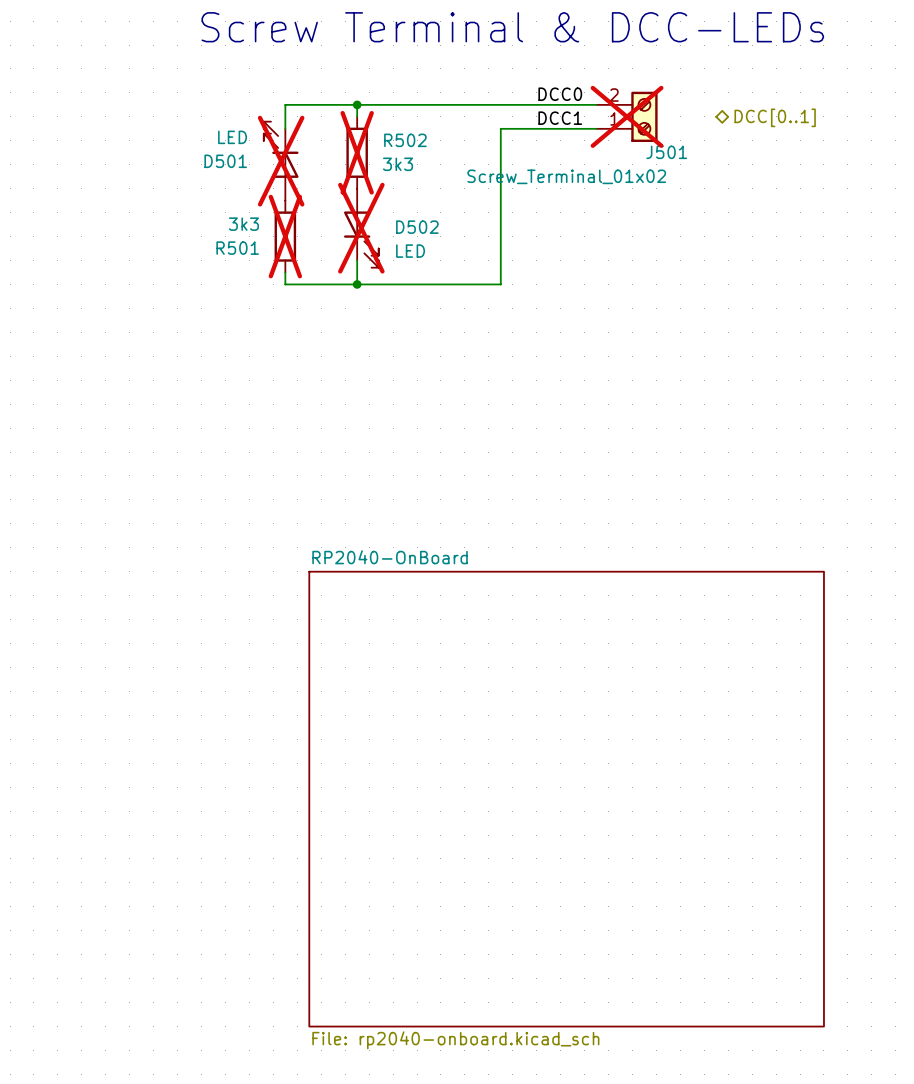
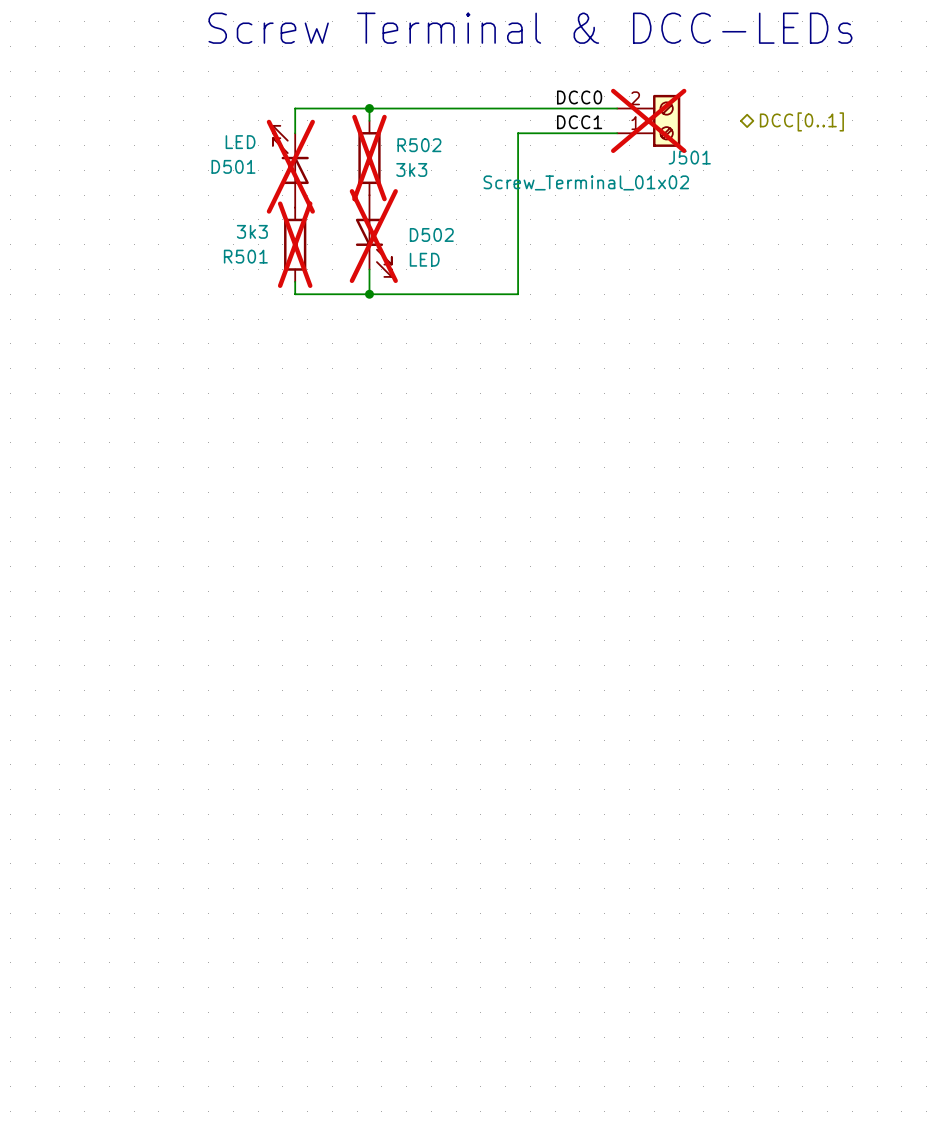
sheet RP2040-OnBoard: File: rp2040-onboard.kicad_sch (566, 799) -> none

